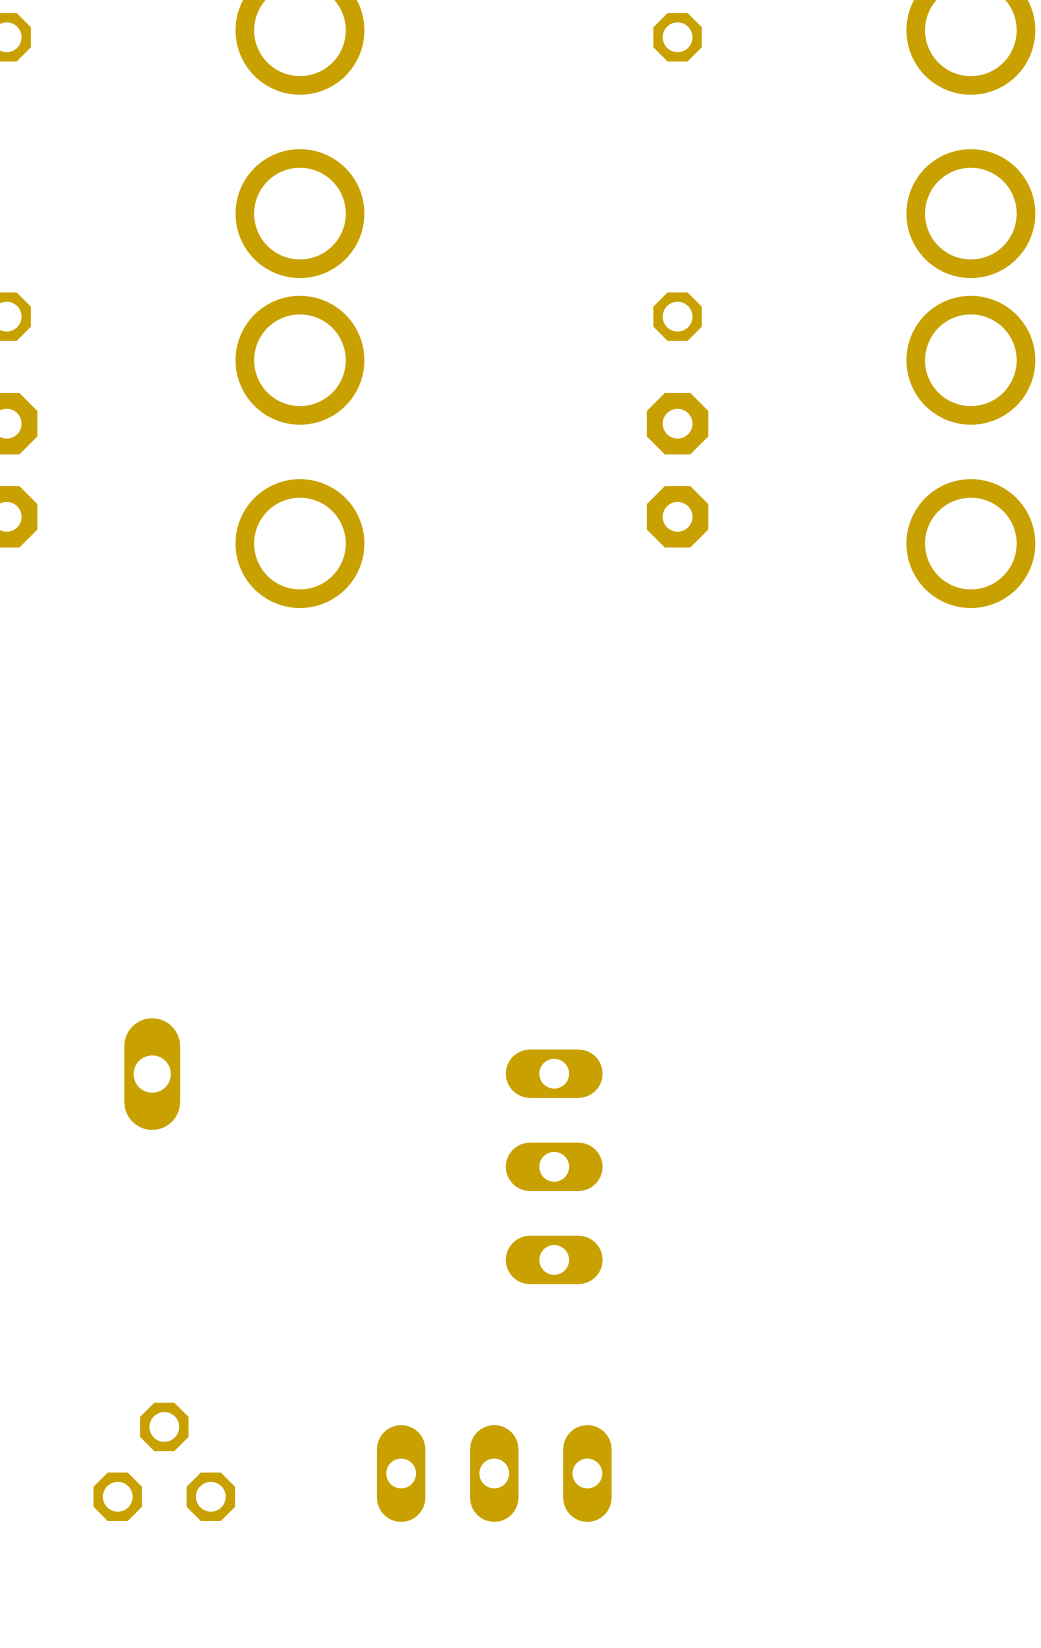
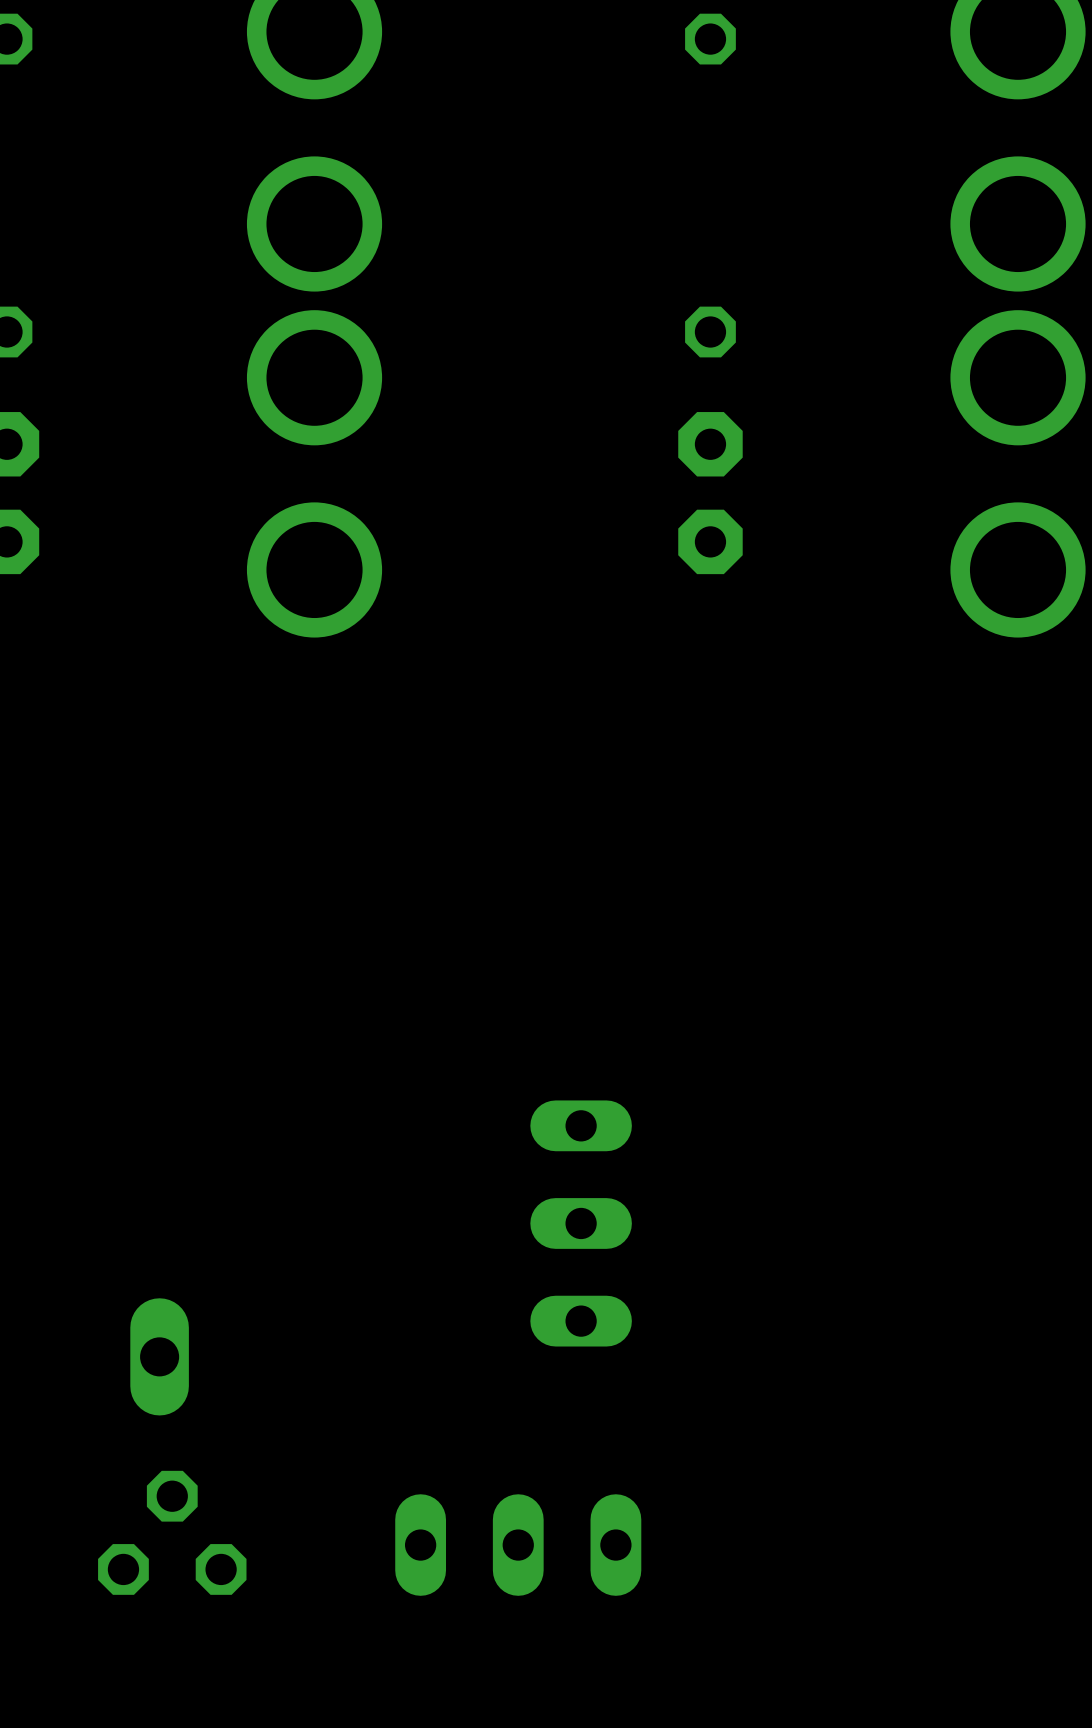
part position: (152, 1074) -> (159, 1356)

